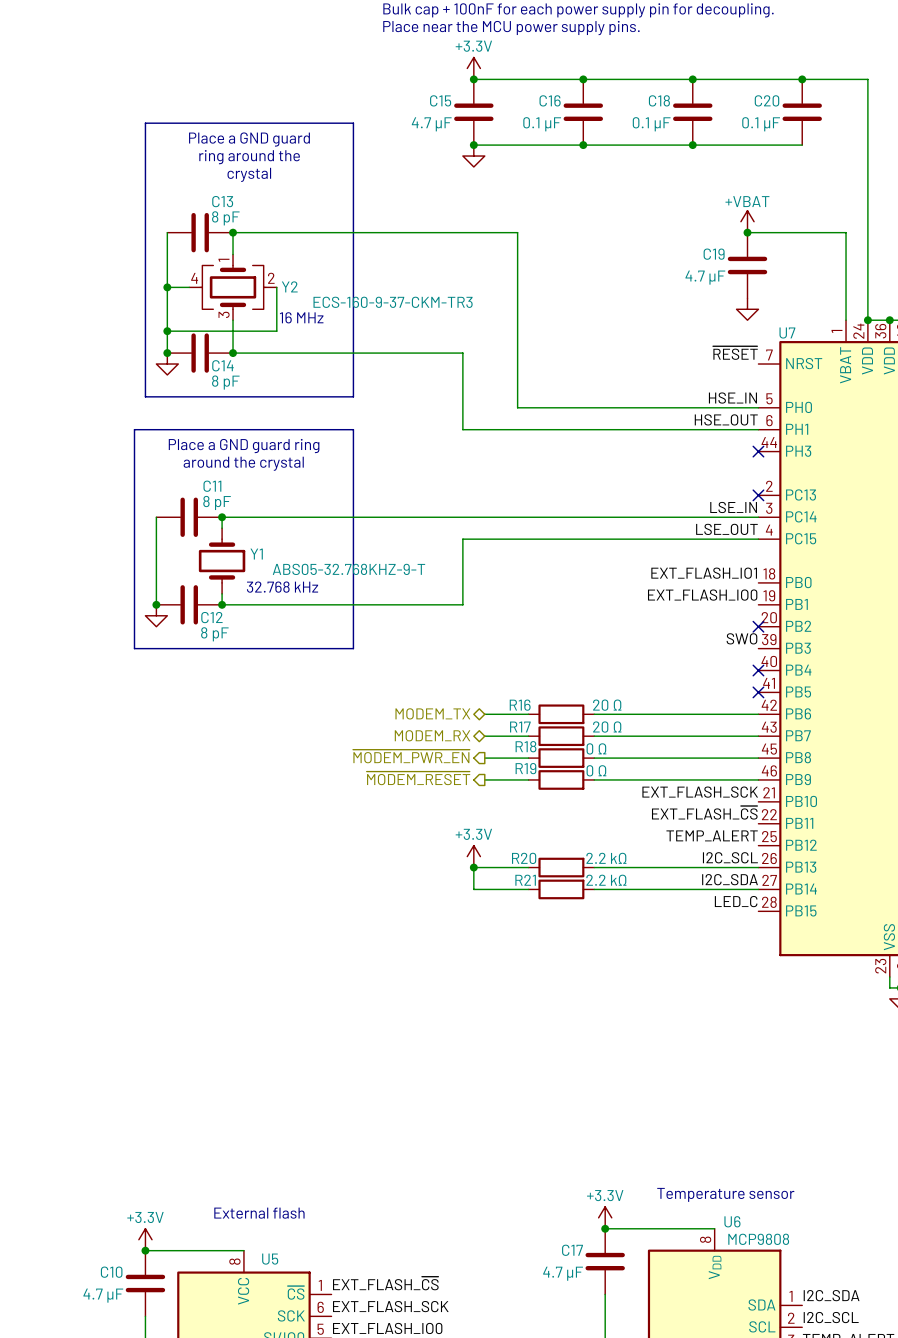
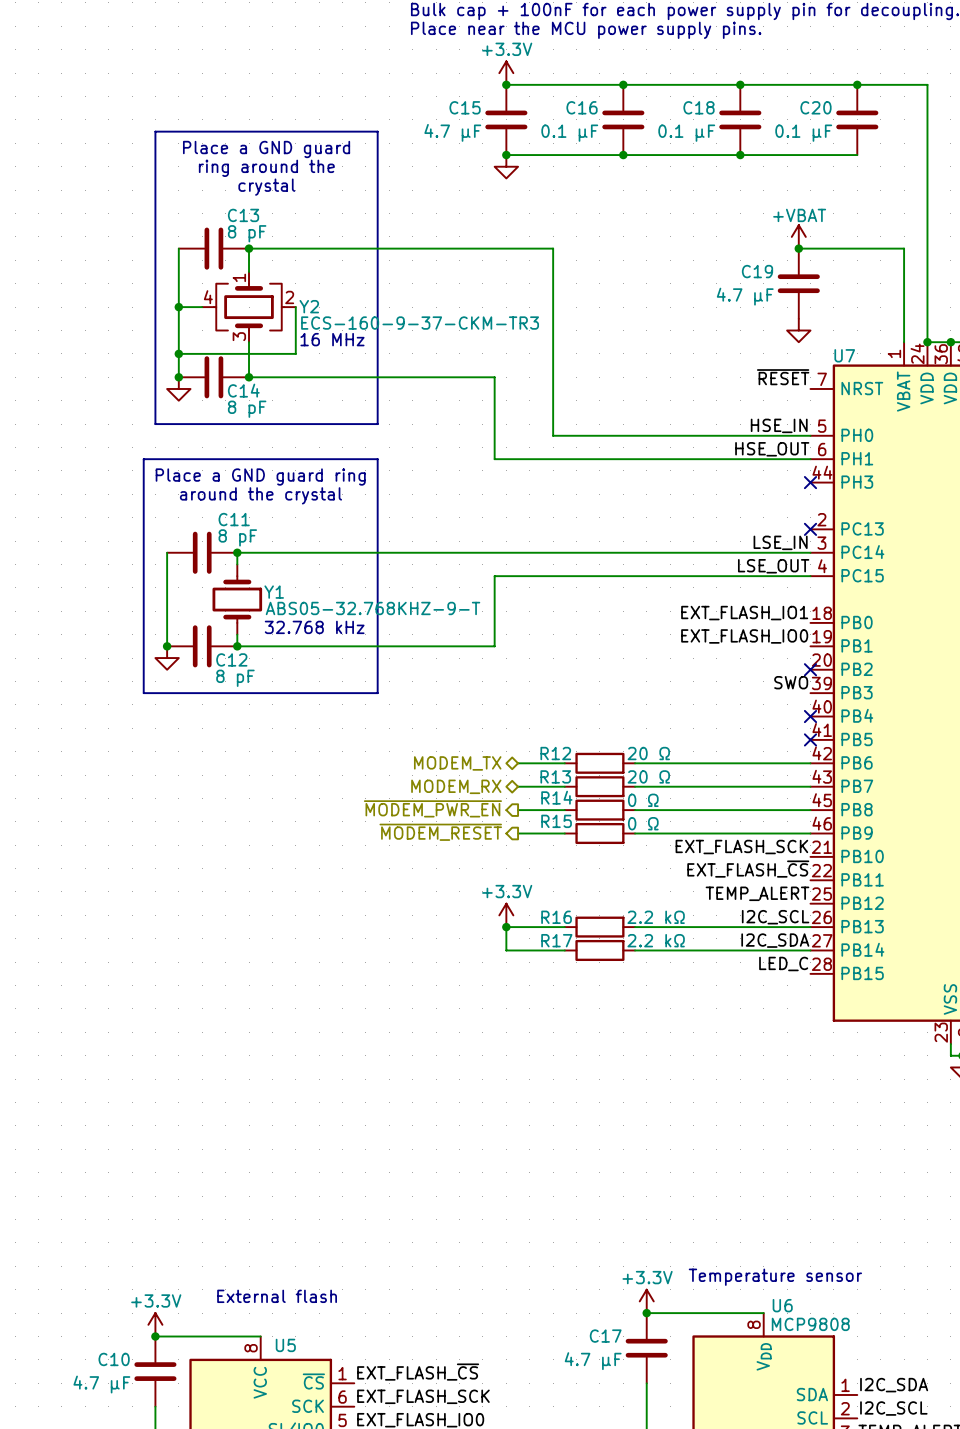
R16 name: R16 (520, 705) -> R12 (555, 753)
R17 name: R17 (520, 727) -> R13 (555, 776)
R18 name: R18 (525, 746) -> R14 (556, 797)
R19 name: R19 (525, 768) -> R15 (556, 821)
R20 name: R20 (524, 858) -> R16 (556, 917)
R21 name: R21 (525, 880) -> R17 (556, 940)

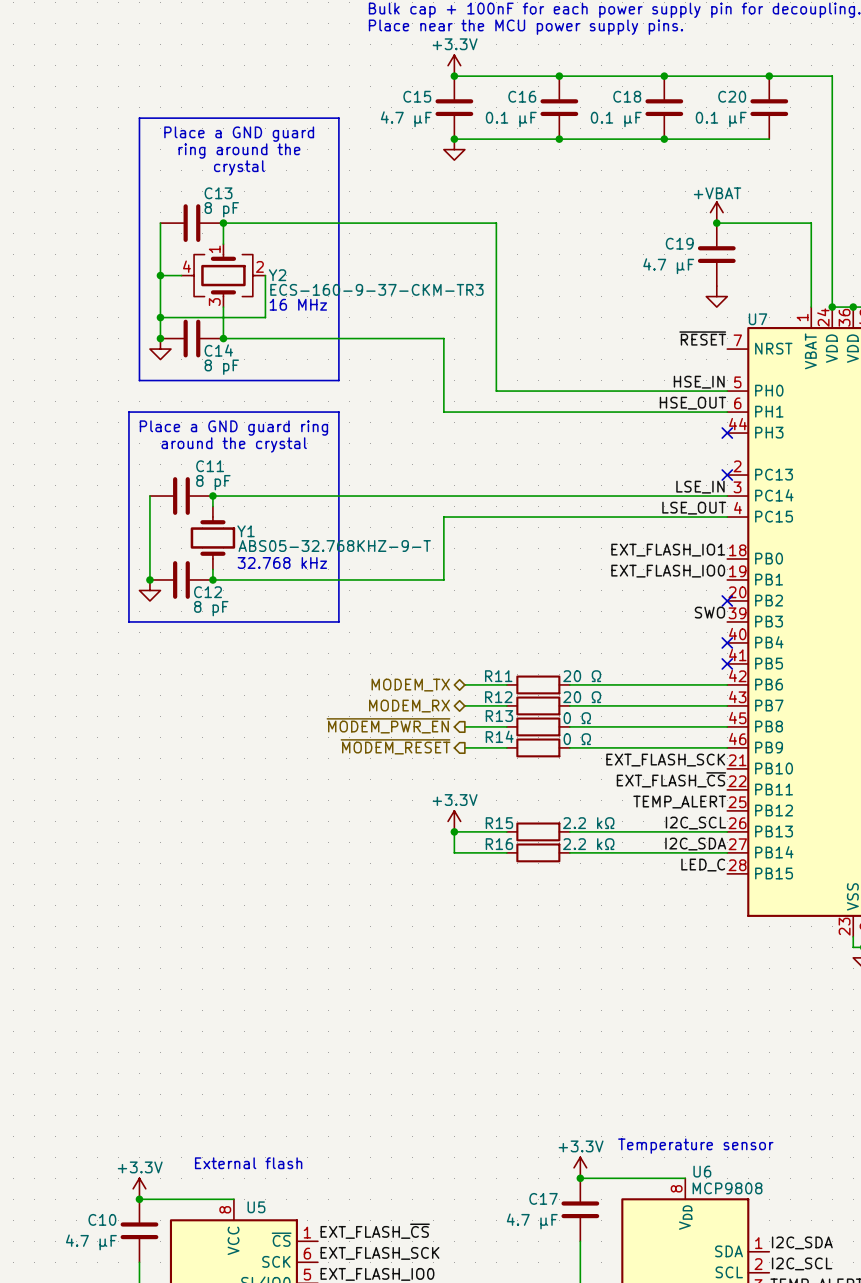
R12 name: R12 (555, 753) -> R11 (498, 676)
R13 name: R13 (555, 776) -> R12 (498, 697)
R14 name: R14 (556, 797) -> R13 (499, 716)
R15 name: R15 (556, 821) -> R14 (499, 736)
R16 name: R16 (556, 917) -> R15 (499, 823)
R17 name: R17 (556, 940) -> R16 (499, 844)

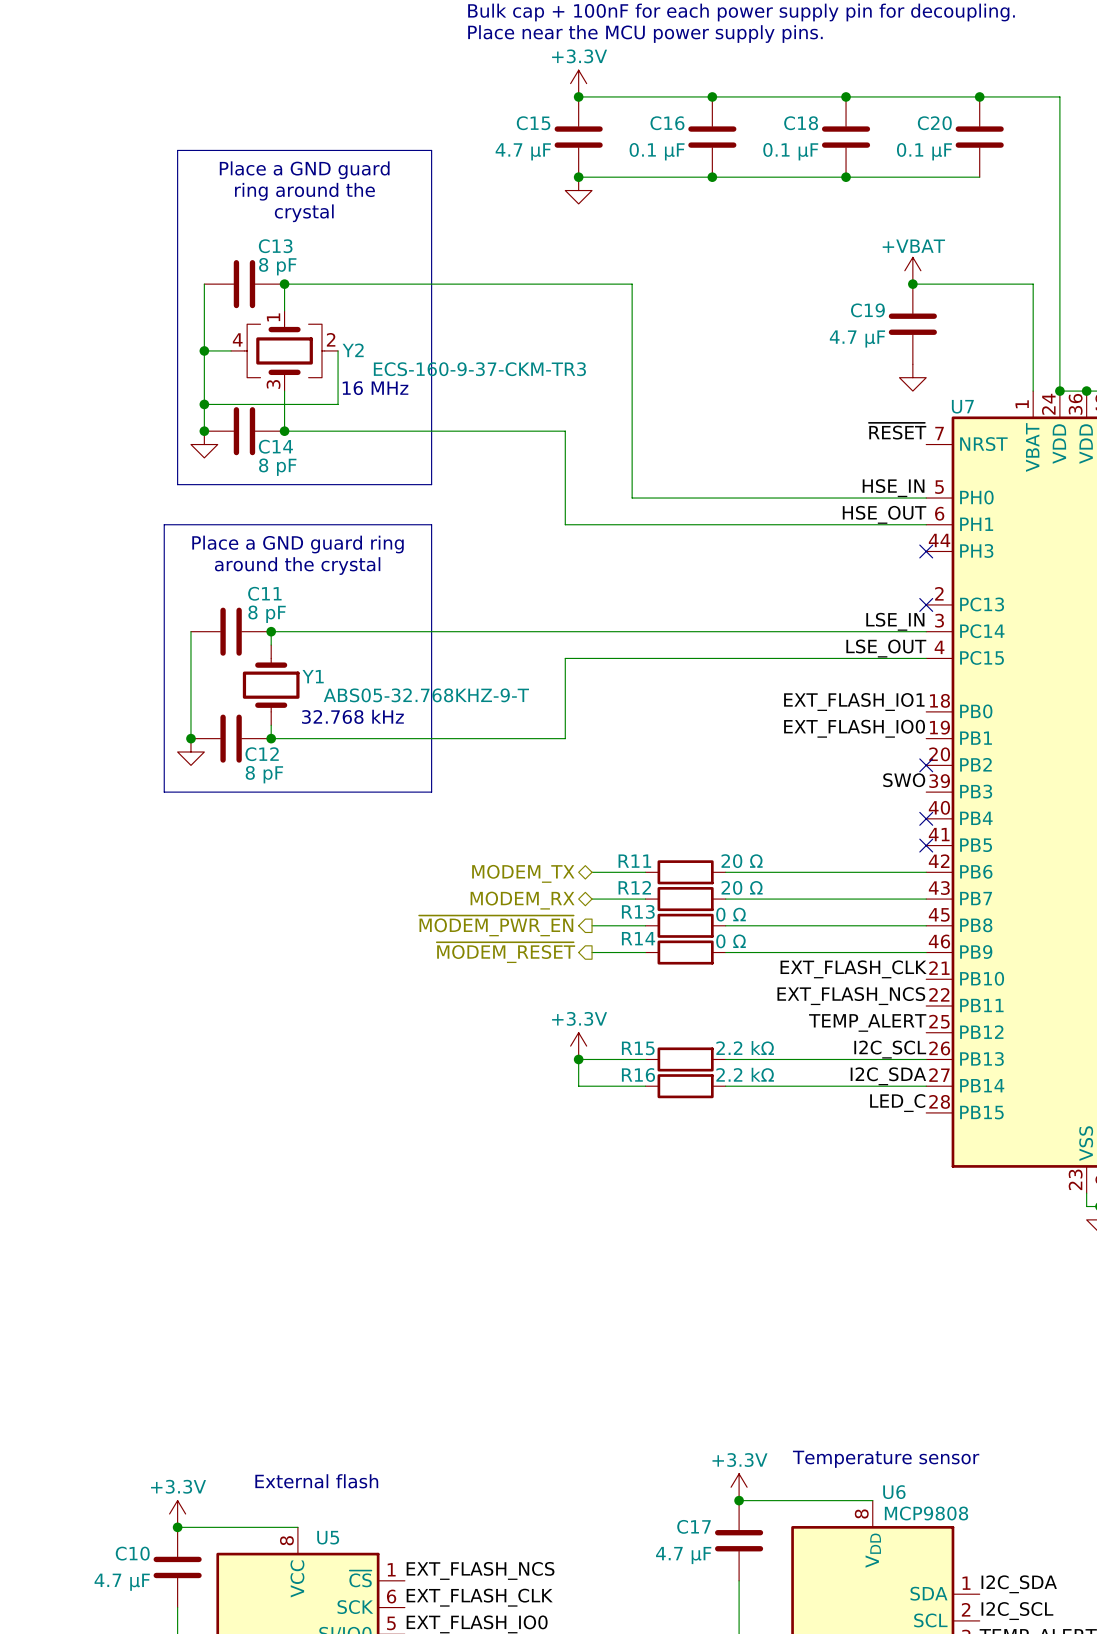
label: EXT_FLASH_SCK (665, 760) -> EXT_FLASH_CLK (853, 969)
label: EXT_FLASH_~{CS} (671, 779) -> EXT_FLASH_NCS (851, 996)
label: EXT_FLASH_~{CS} (375, 1231) -> EXT_FLASH_NCS (480, 1570)
label: EXT_FLASH_SCK (379, 1253) -> EXT_FLASH_CLK (479, 1597)

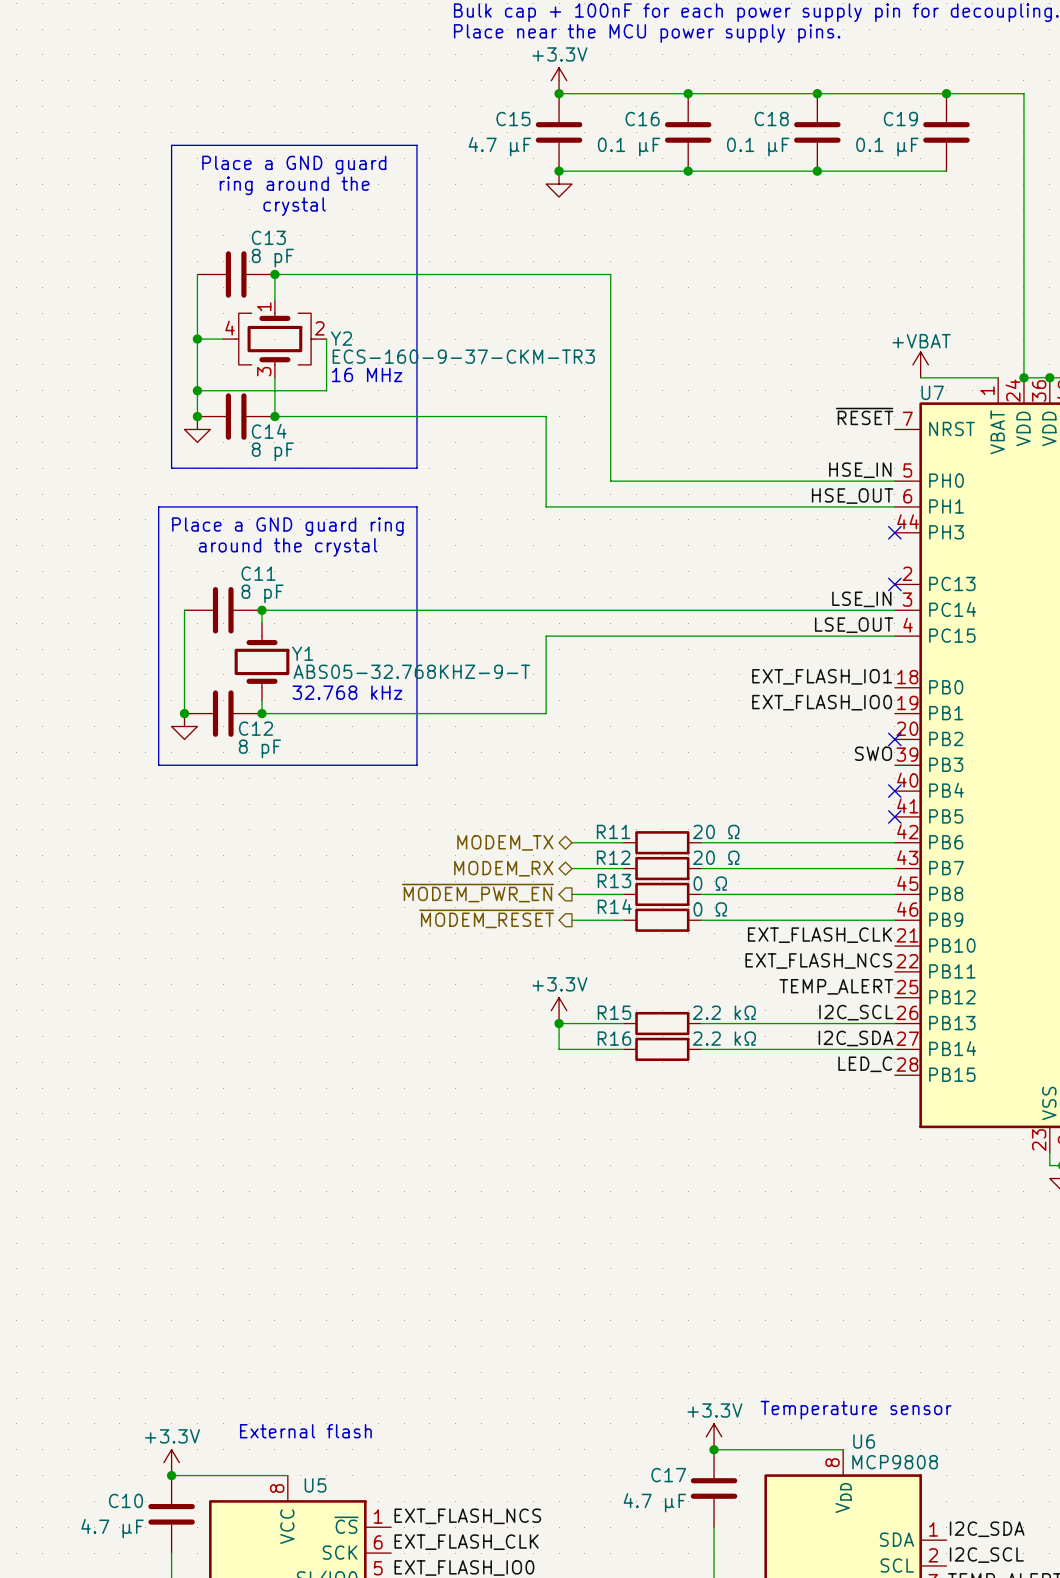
C20 name: C20 (934, 123) -> C19 (900, 119)
power symbol position: +VBAT (912, 270) -> +VBAT (920, 364)
wire: (912, 284) (1033, 284) (1033, 391) -> (920, 377) (998, 377)
junction: (912, 284) -> none
C19: 4.7 µF (912, 324) -> none
power symbol: (912, 377) -> none

